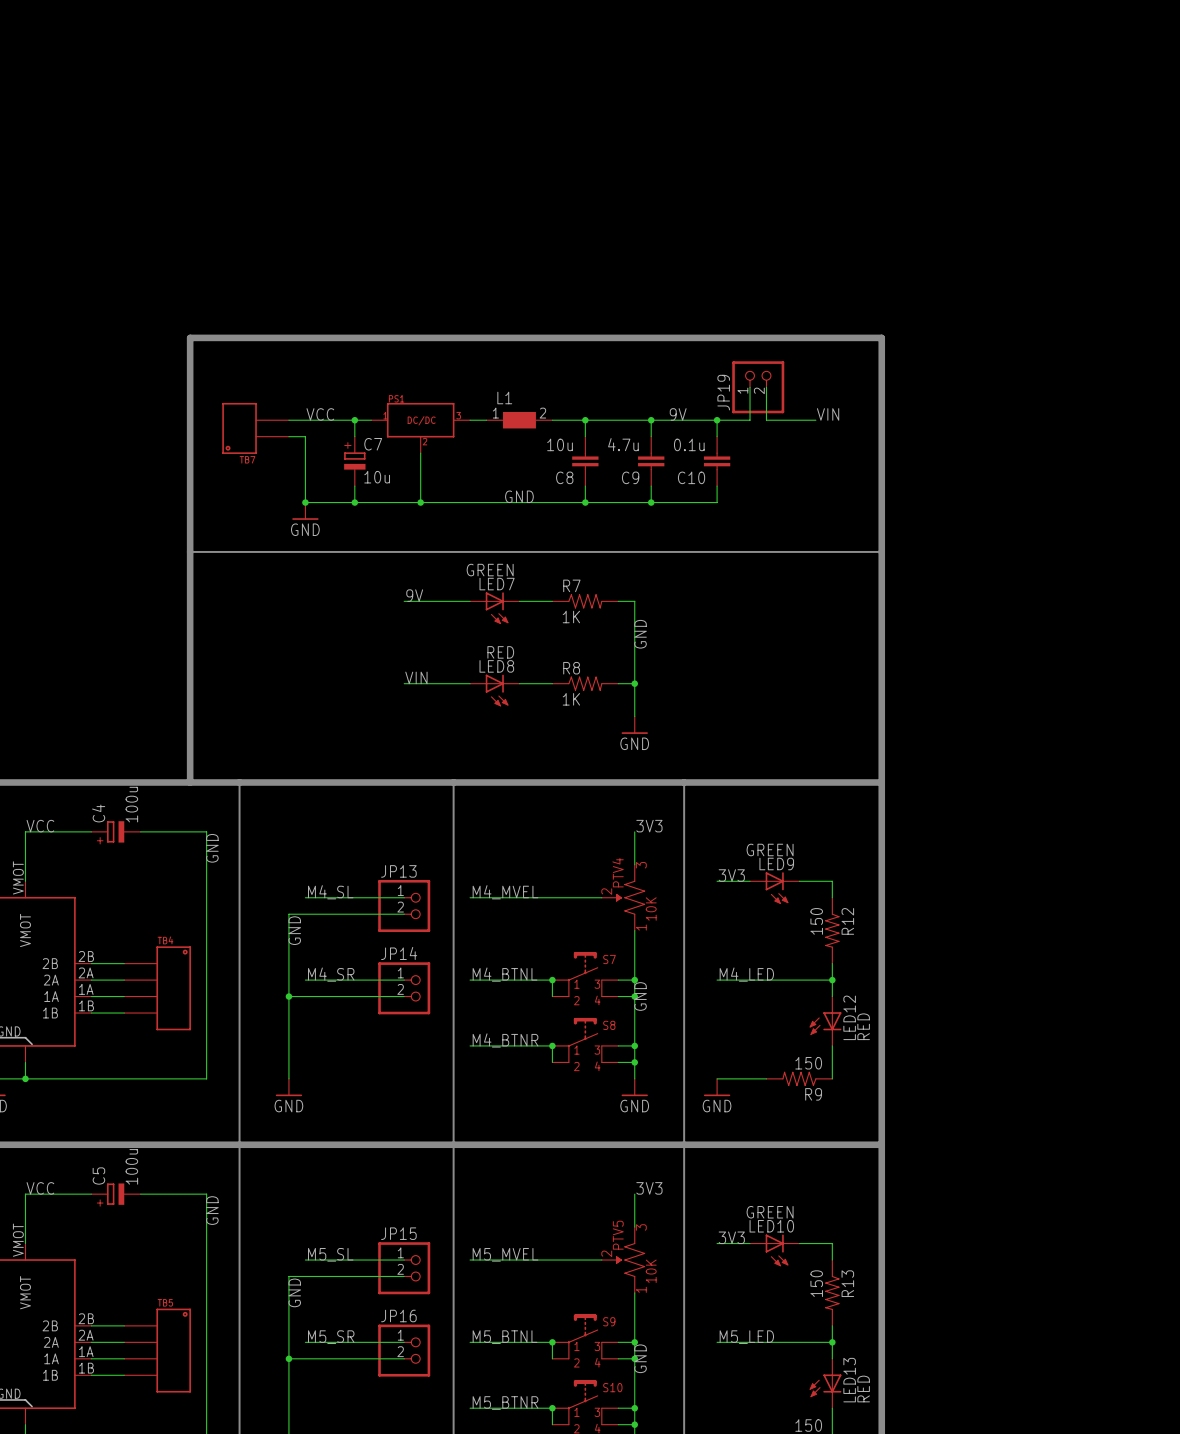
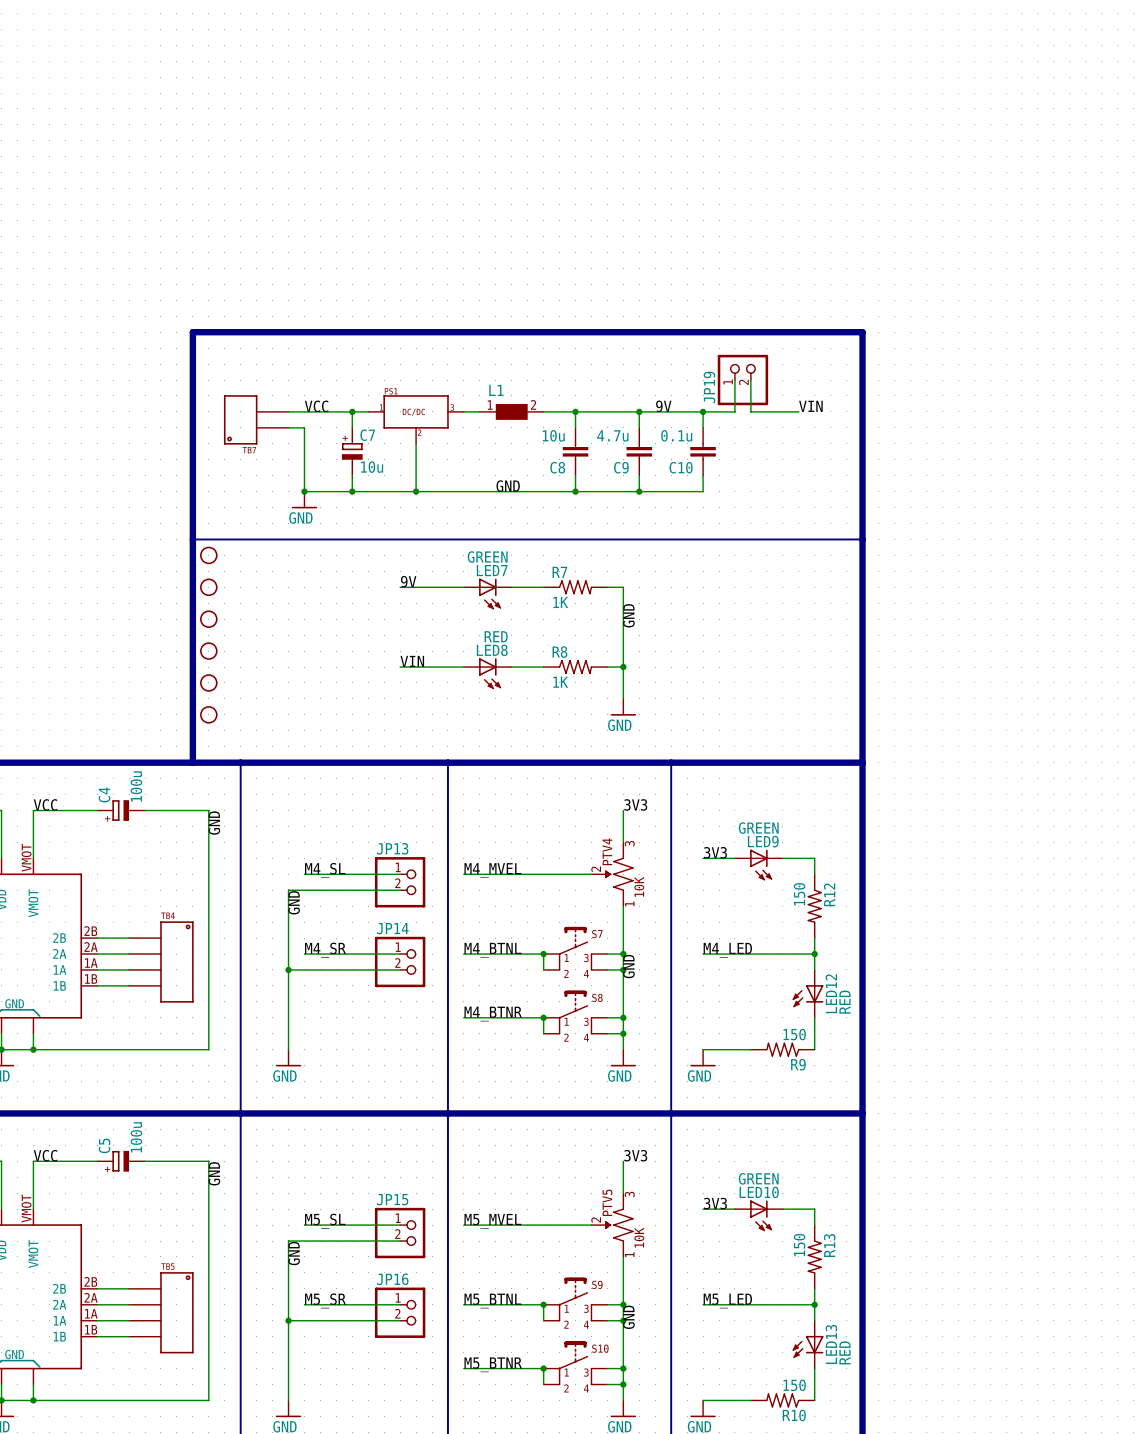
part: none -> (208, 555)
part: none -> (208, 587)
part: none -> (208, 619)
part: none -> (208, 651)
part: none -> (208, 682)
part: none -> (208, 714)

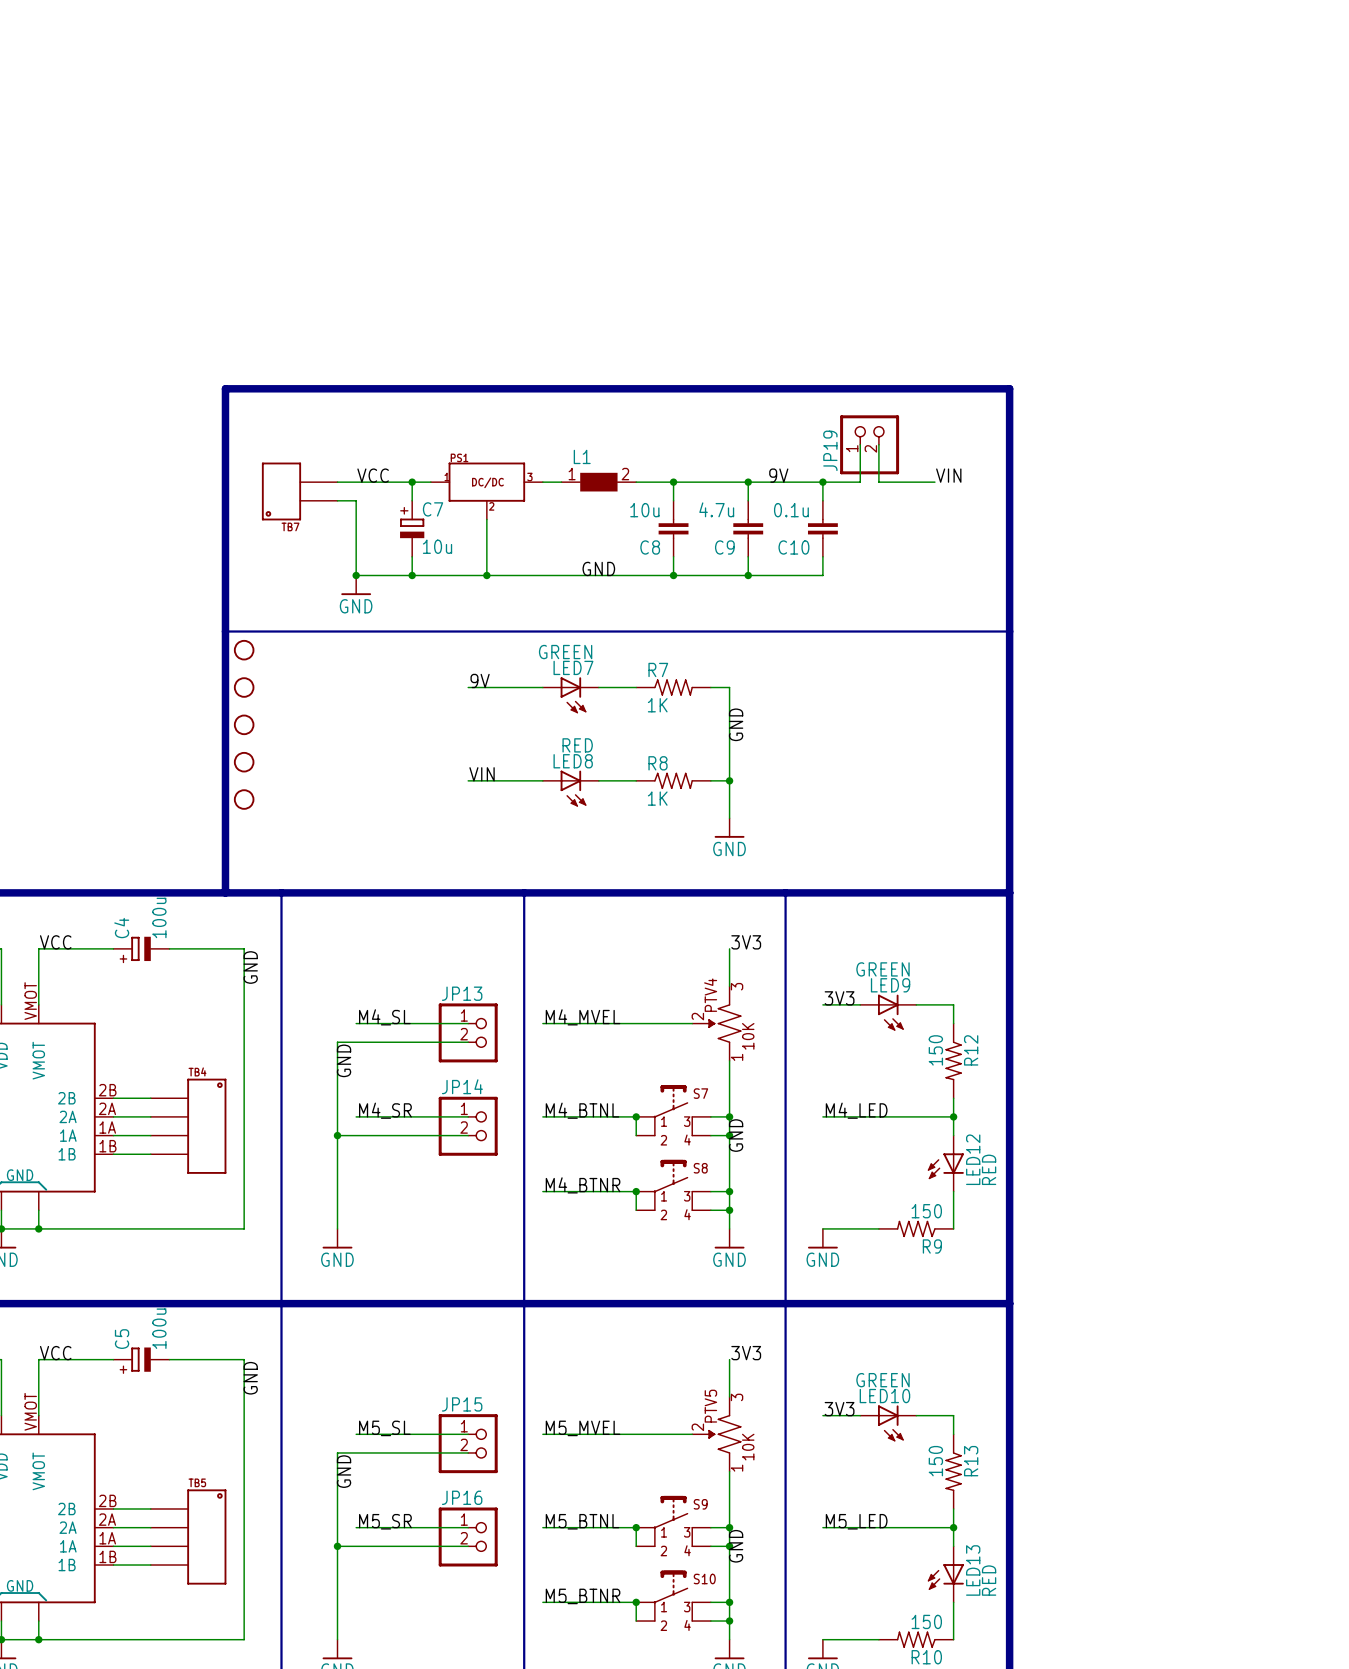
part: (208, 714) -> none

